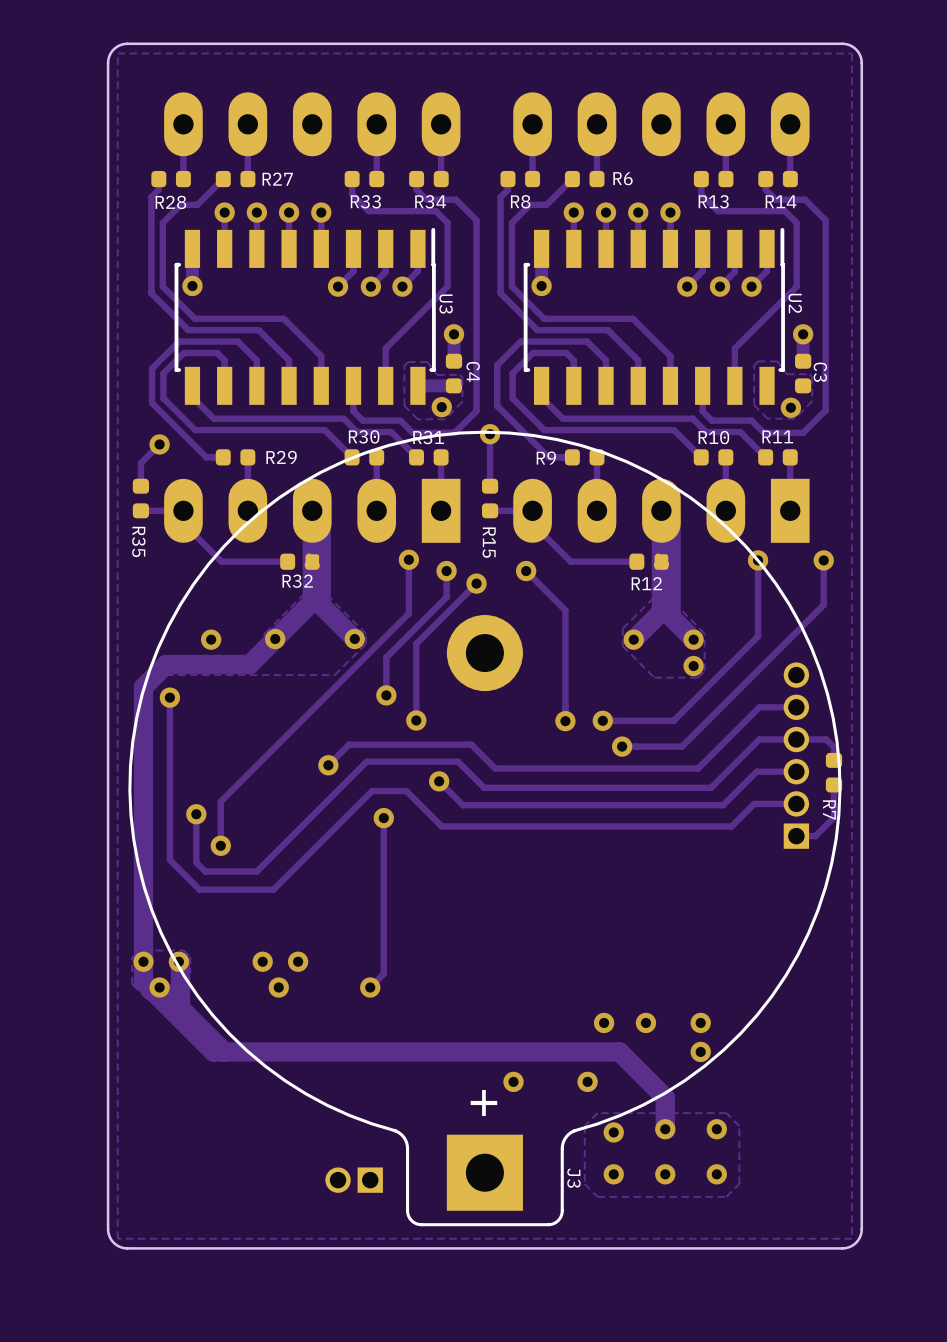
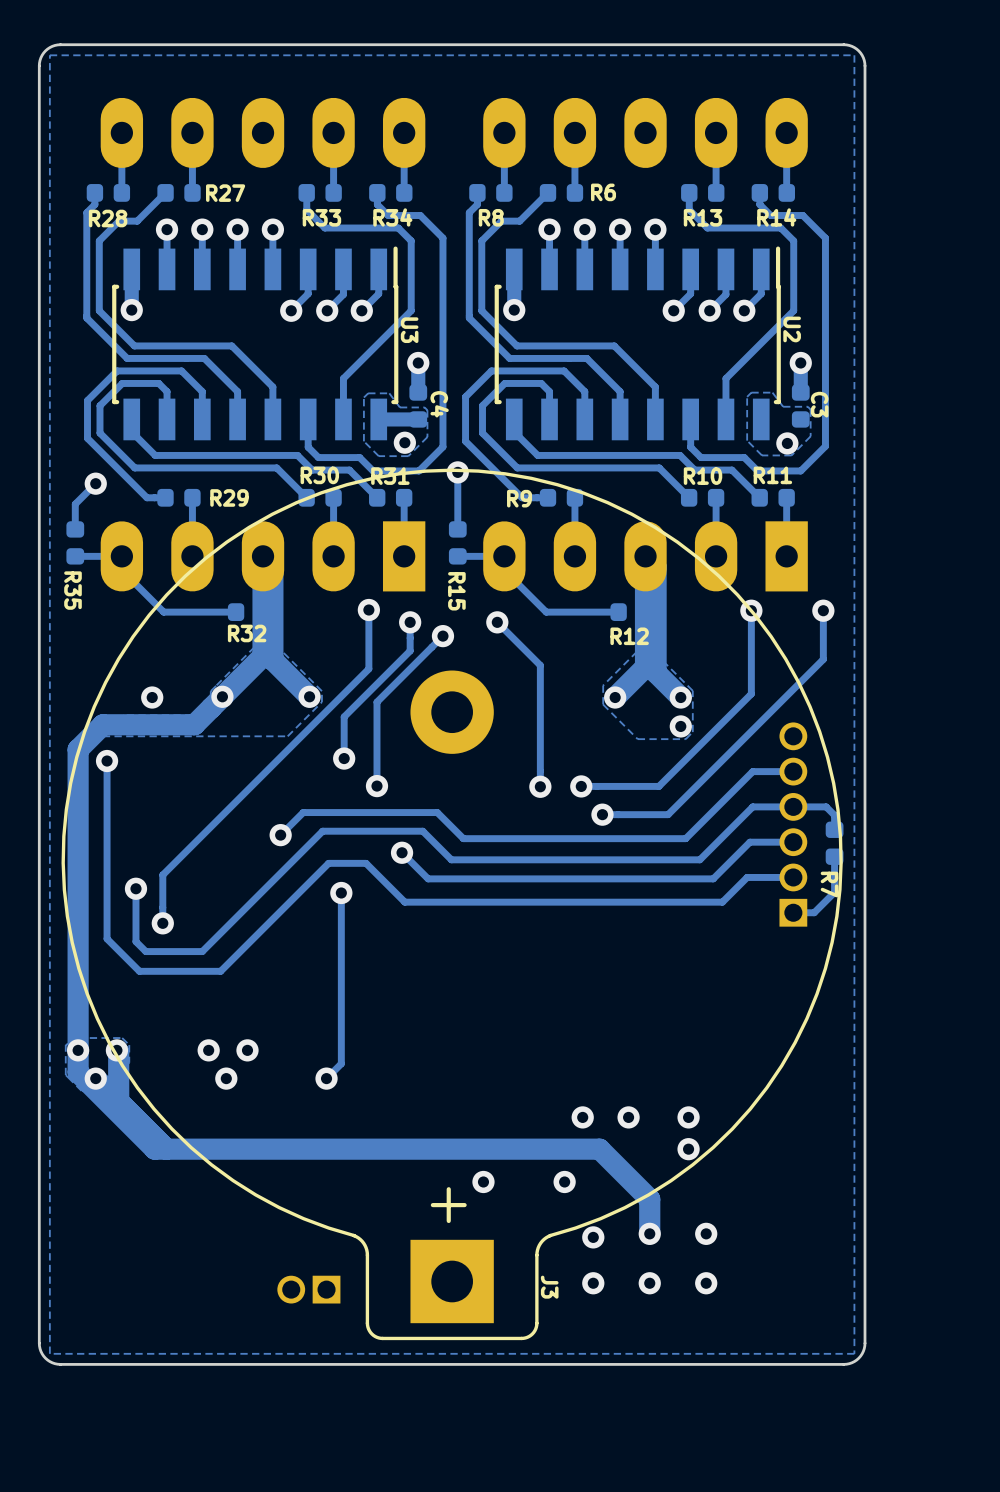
zone outline: (726, 1113) (597, 1113) (584, 1126) (584, 1183) (597, 1196) (726, 1196) (739, 1183) (739, 1126) (726, 1113) -> none

